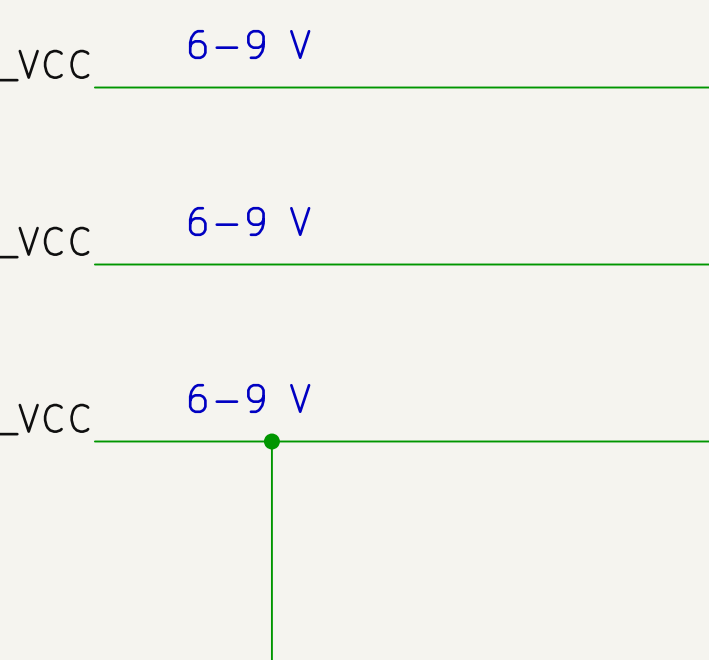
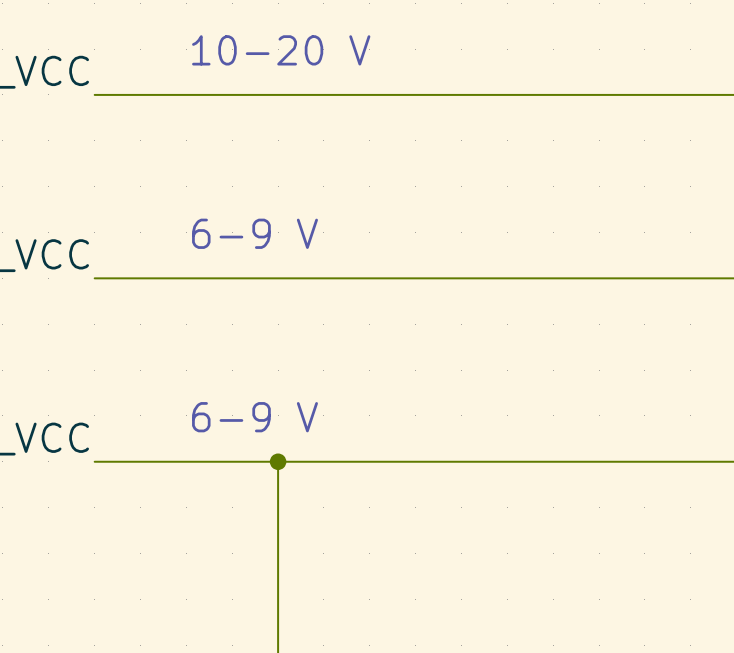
text: 6-9 V (249, 44) -> 10-20 V (281, 50)

